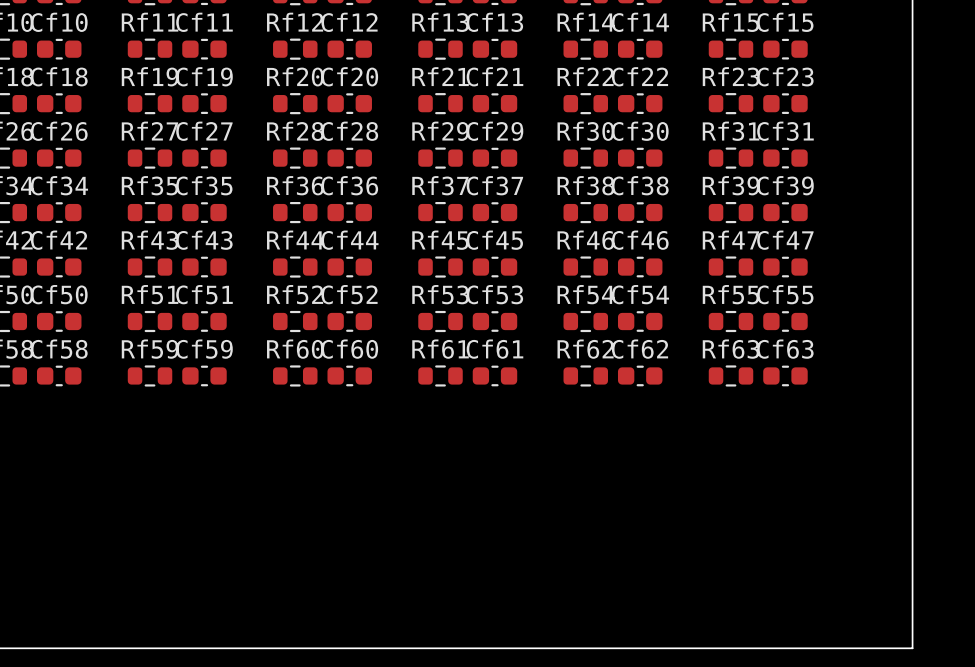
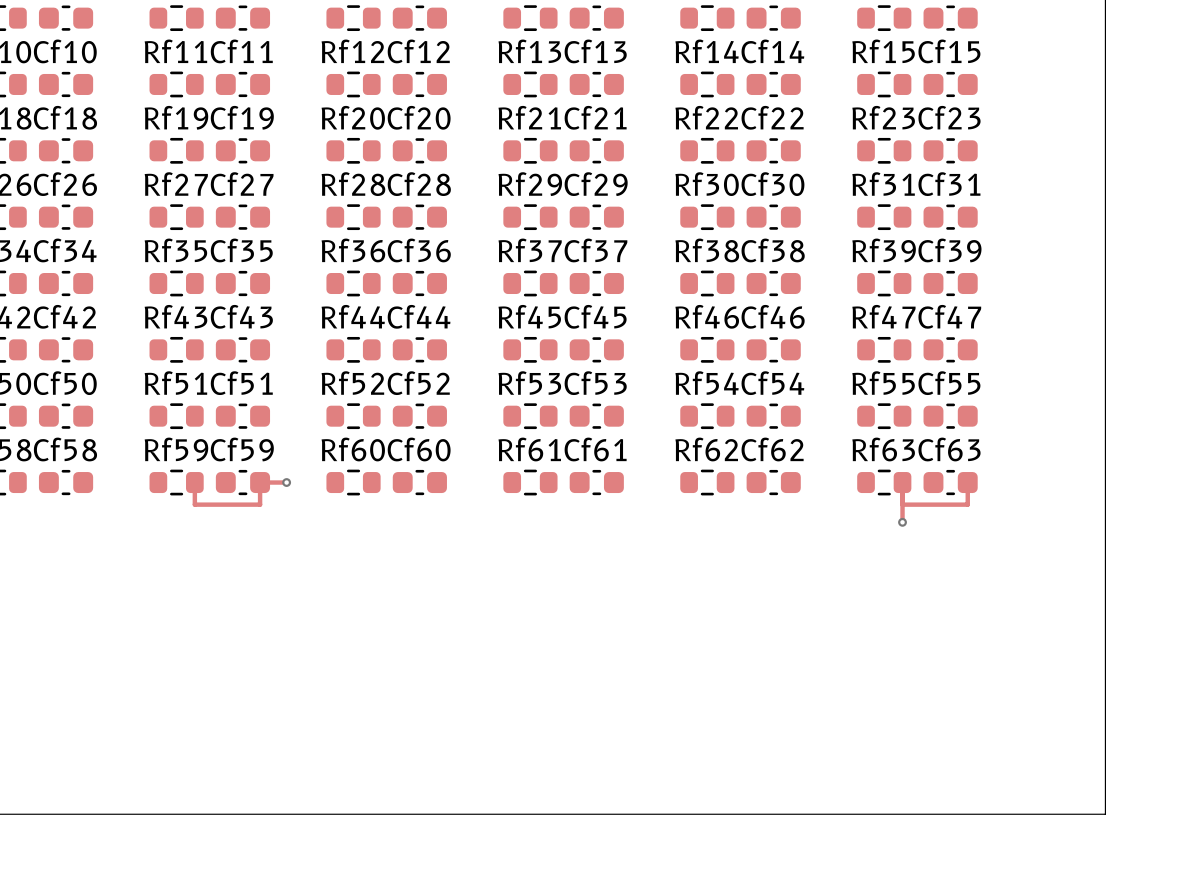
track: none -> (194, 482) (194, 504) (260, 504) (260, 482) (286, 482)
via: none -> (286, 482)
track: none -> (902, 482) (902, 522)
track: none -> (967, 482) (967, 504) (902, 504)
via: none -> (902, 522)

